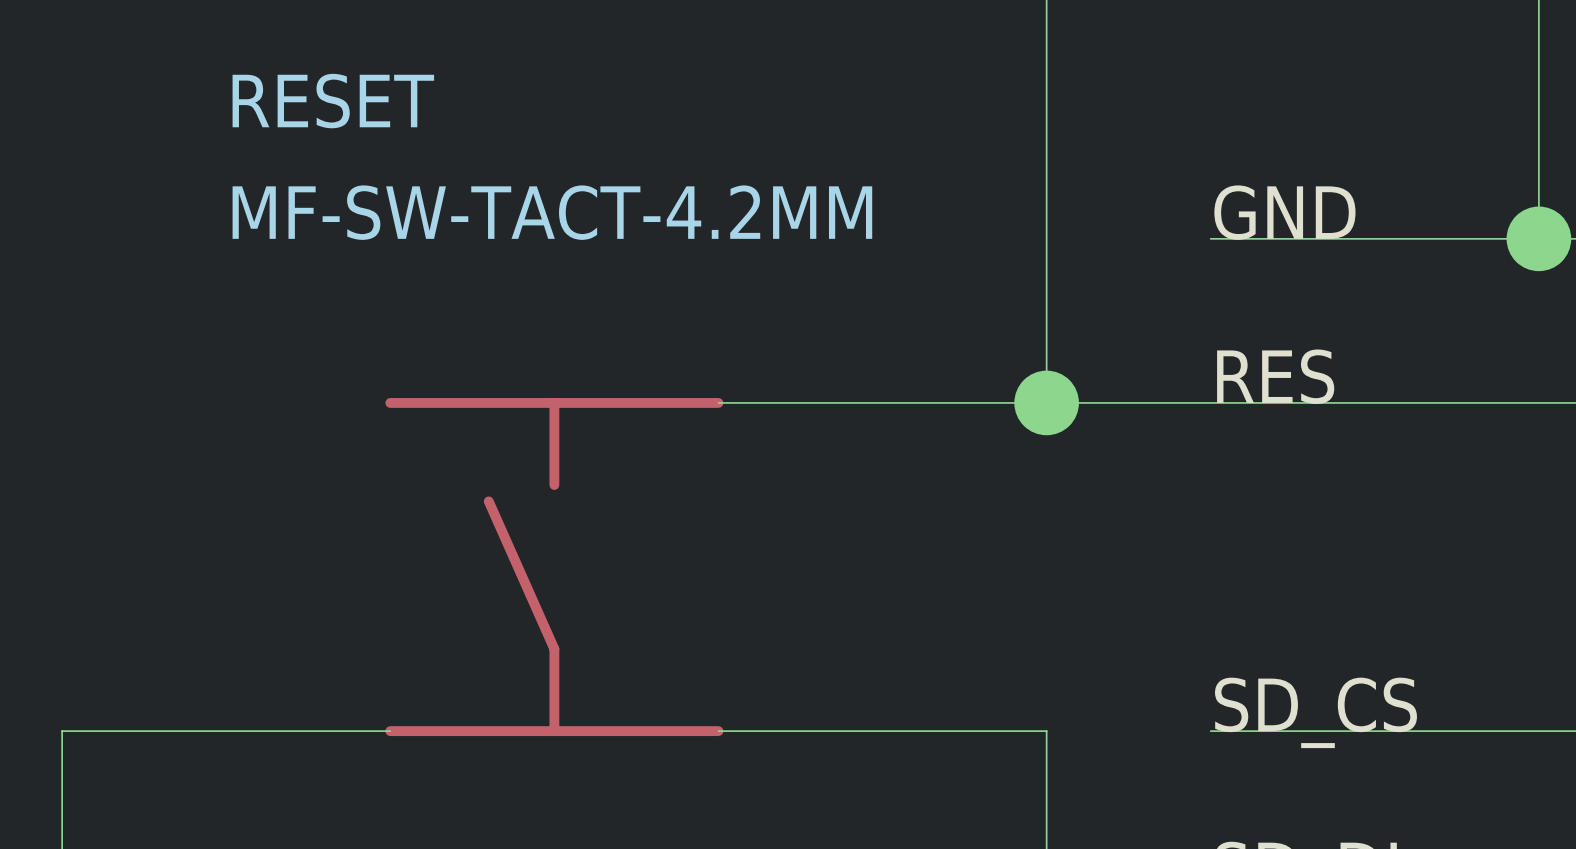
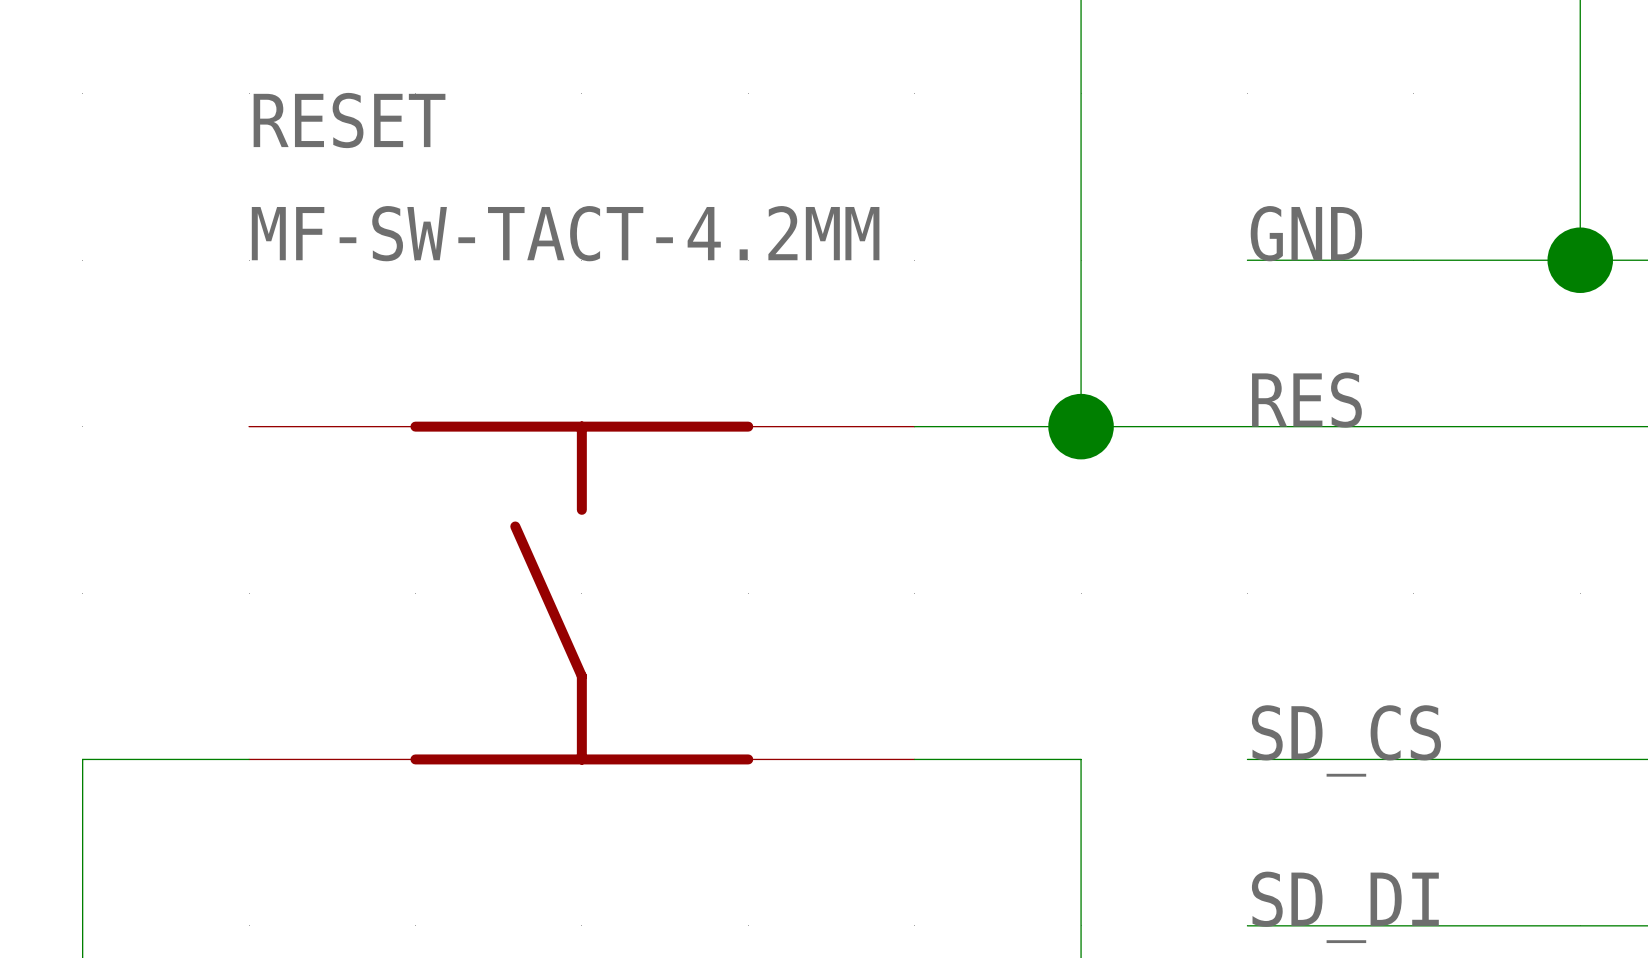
RESET symbol: [385, 398, 724, 737] -> [249, 421, 915, 765]

